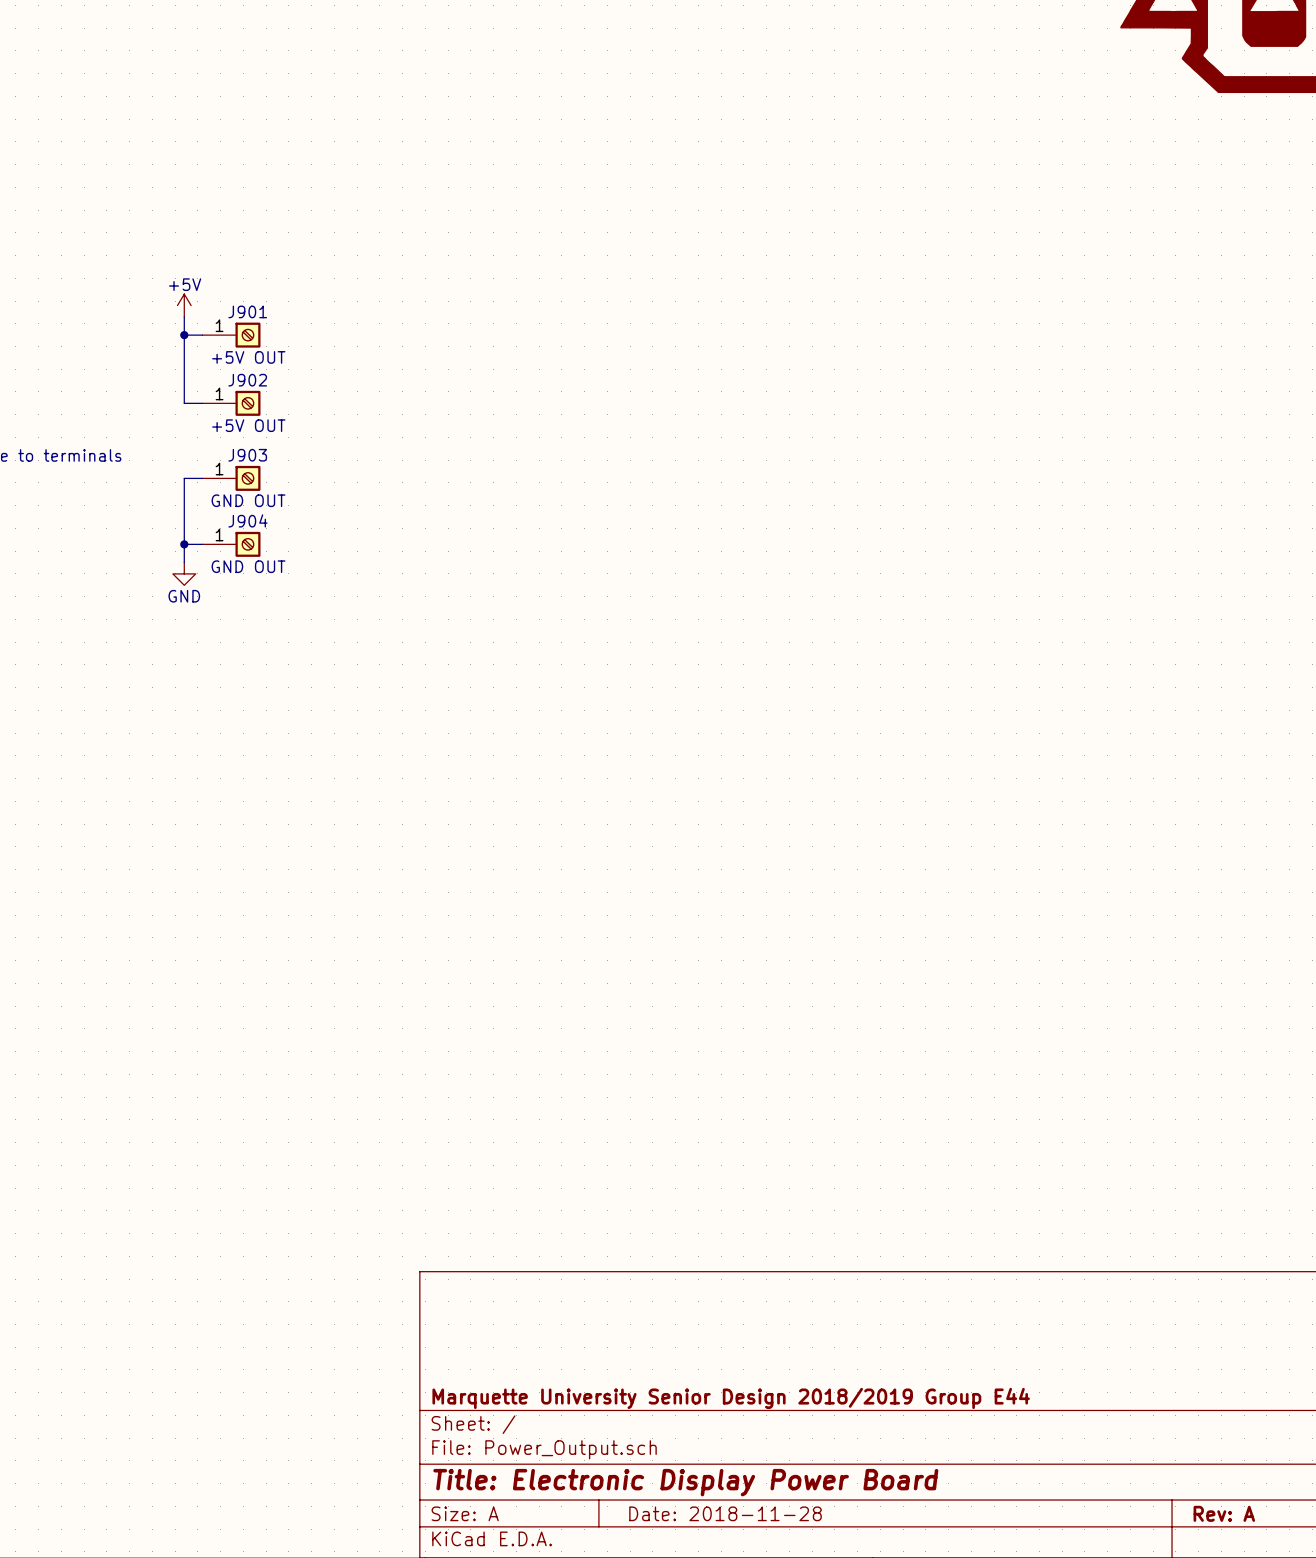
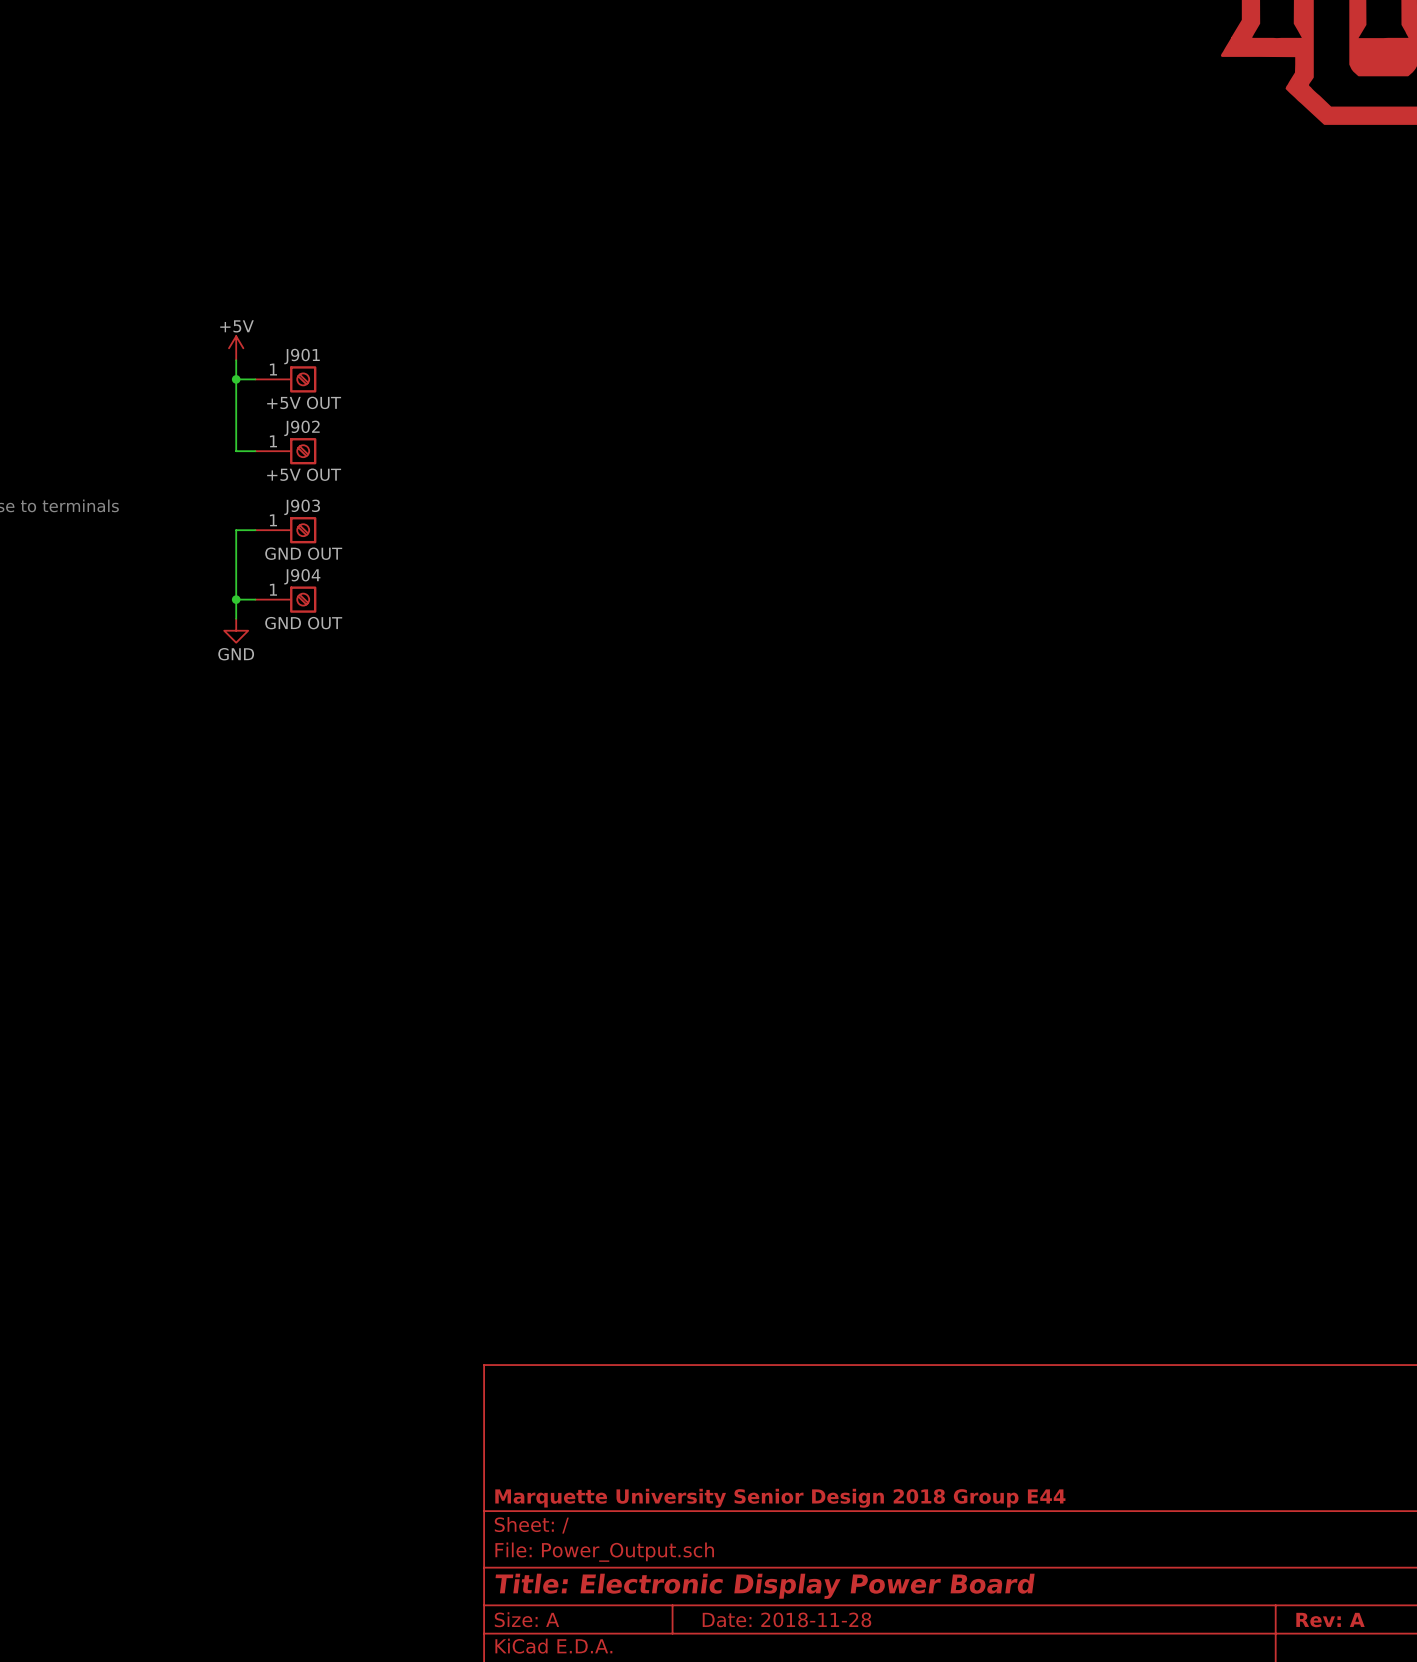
title block: Marquette University Senior Design 2018/2019 Group E44 (731, 1398) -> Marquette University Senior Design 2018 Group E44 (780, 1498)

